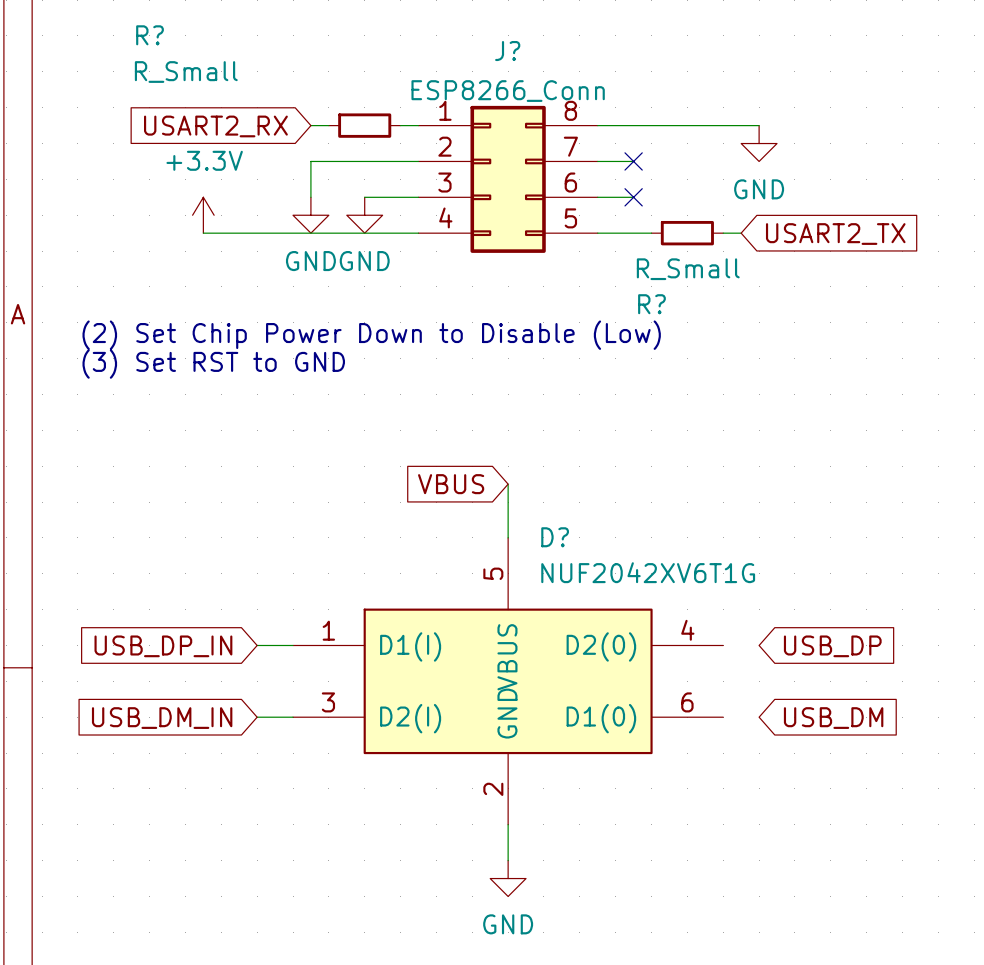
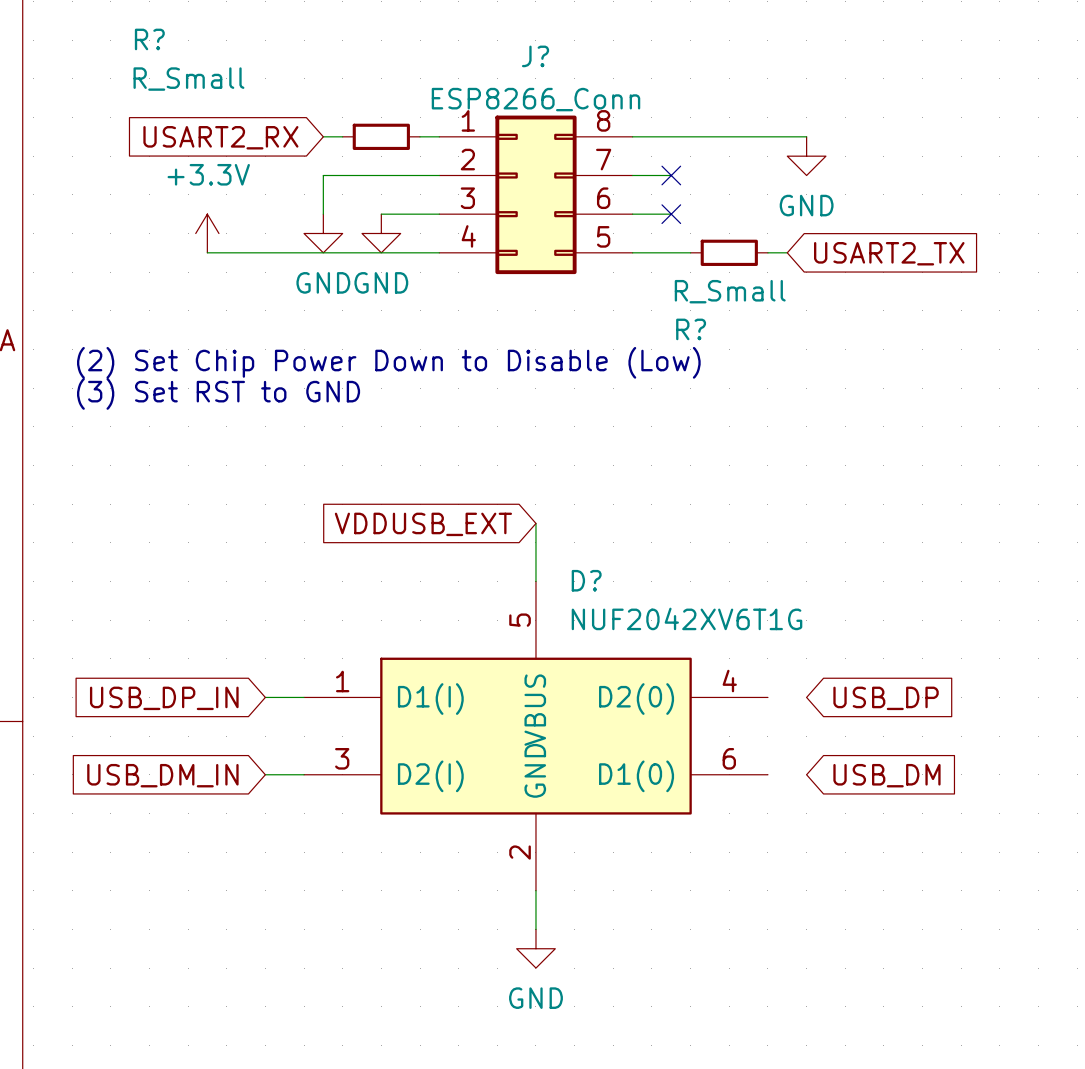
global label: VBUS (451, 484) -> VDDUSB_EXT (423, 524)

